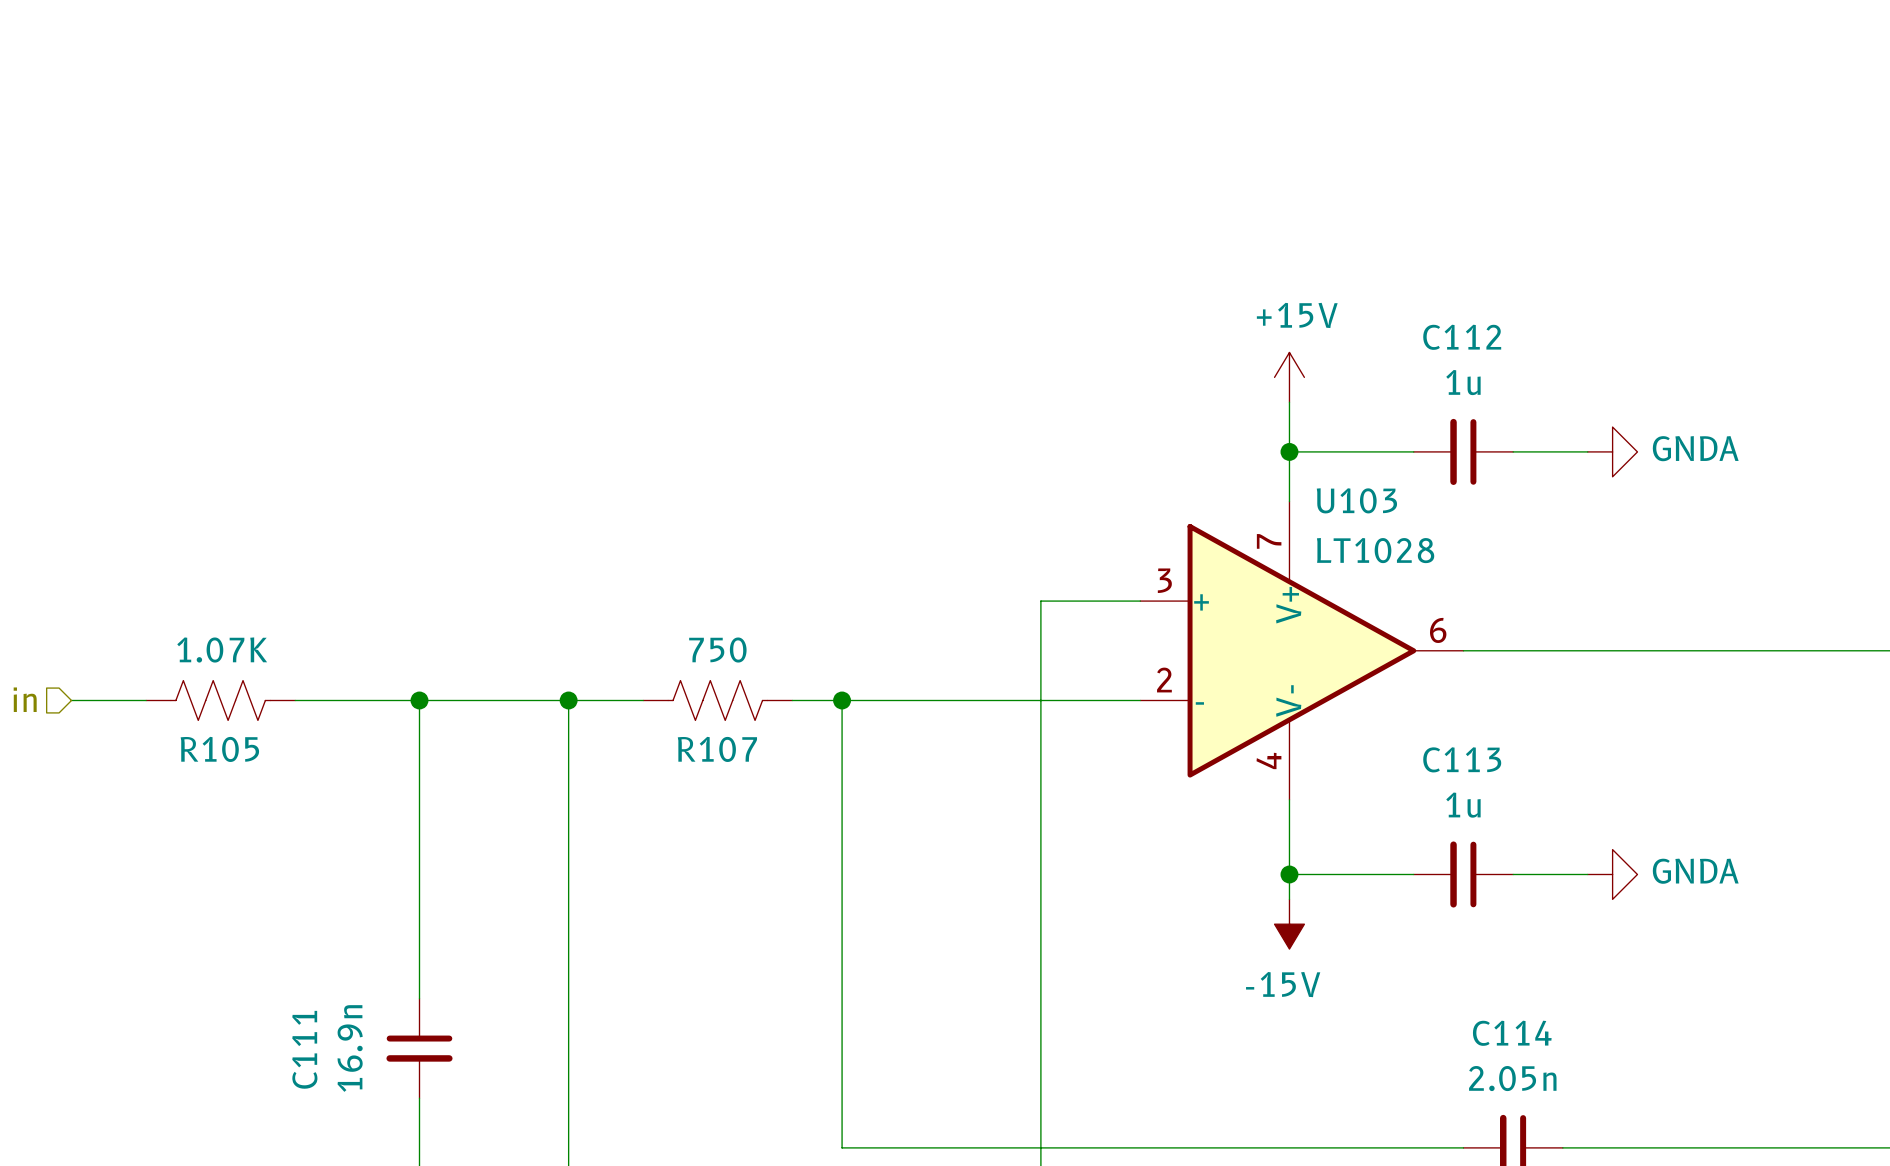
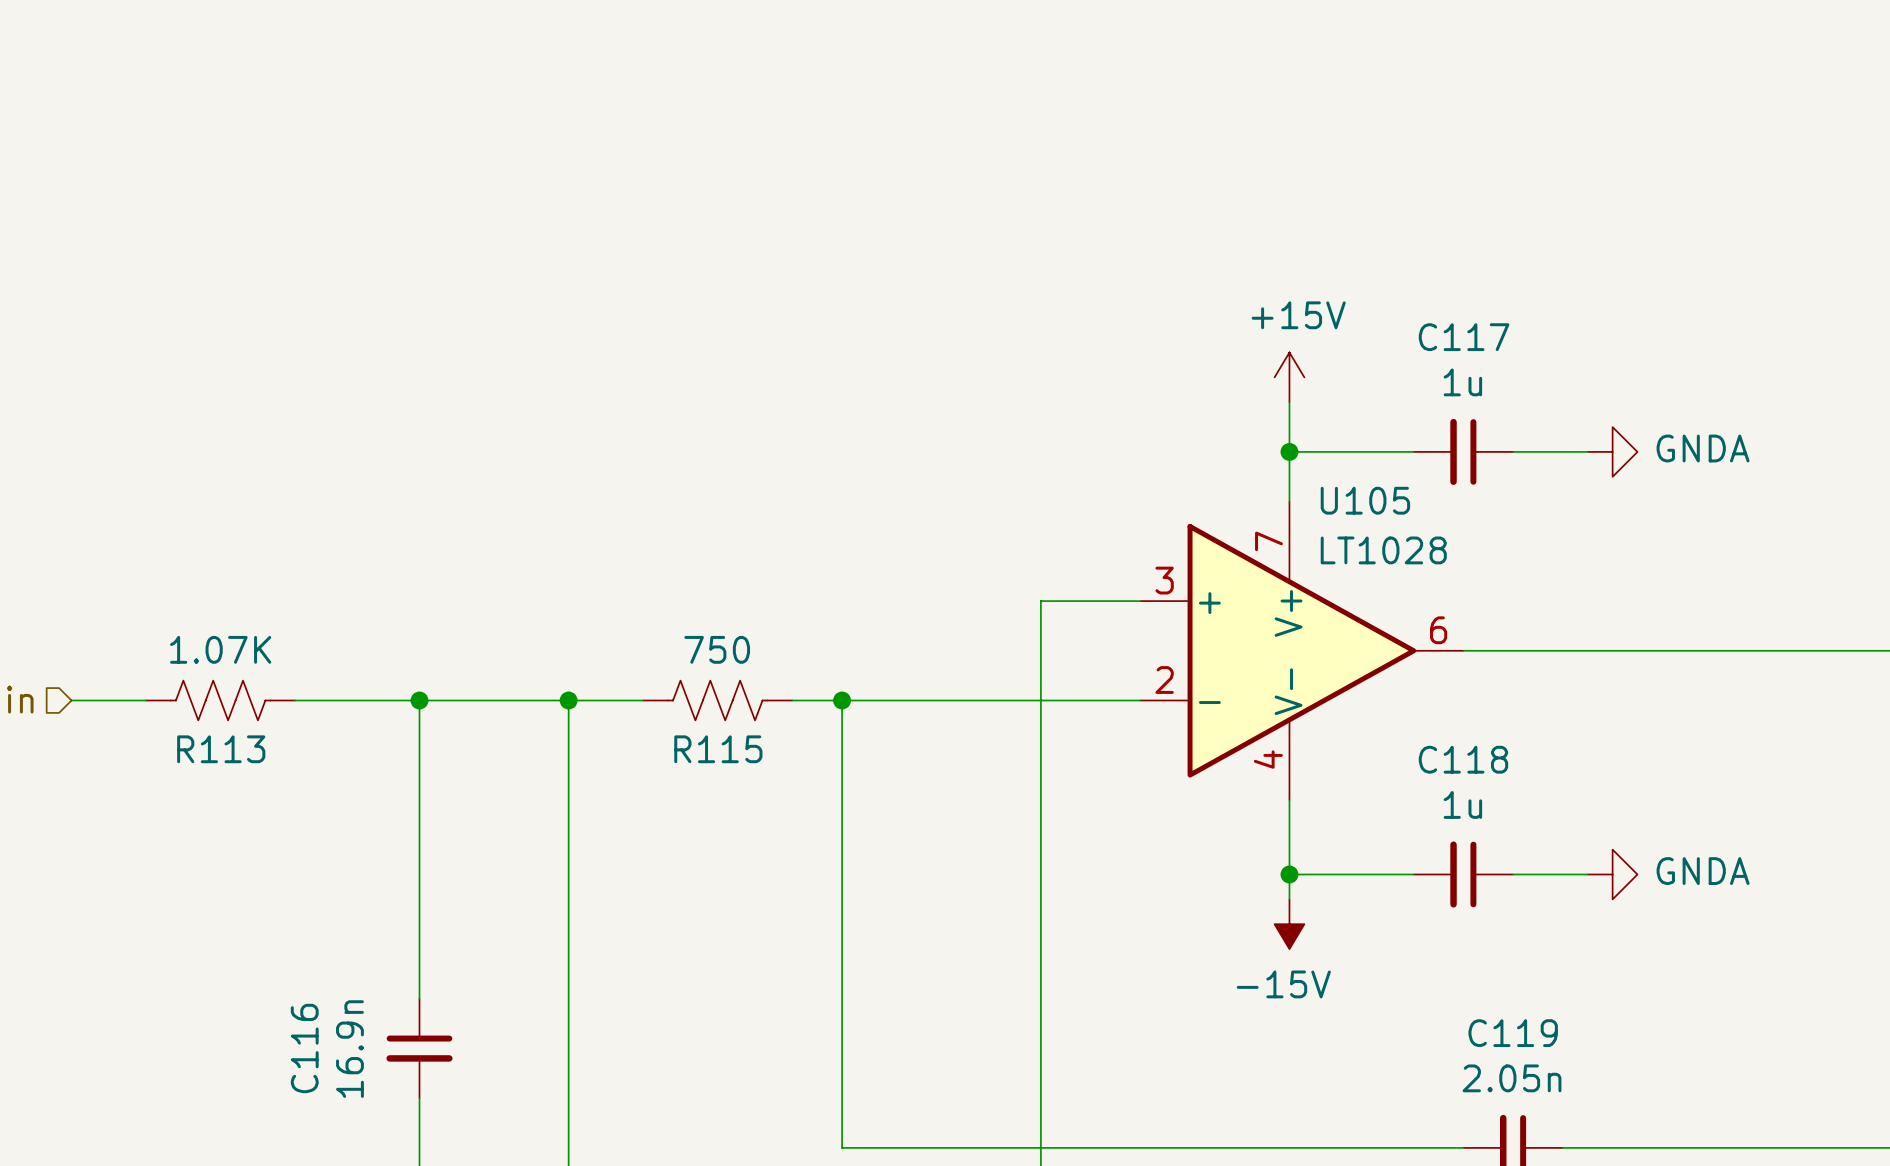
C112 name: C112 (1462, 337) -> C117 (1464, 337)
U103 name: U103 (1356, 500) -> U105 (1365, 500)
R105 name: R105 (219, 749) -> R113 (221, 749)
R107 name: R107 (717, 749) -> R115 (718, 749)
C113 name: C113 (1462, 759) -> C118 (1463, 759)
C114 name: C114 (1512, 1033) -> C119 (1513, 1033)
C111 name: C111 (304, 1049) -> C116 (304, 1048)

